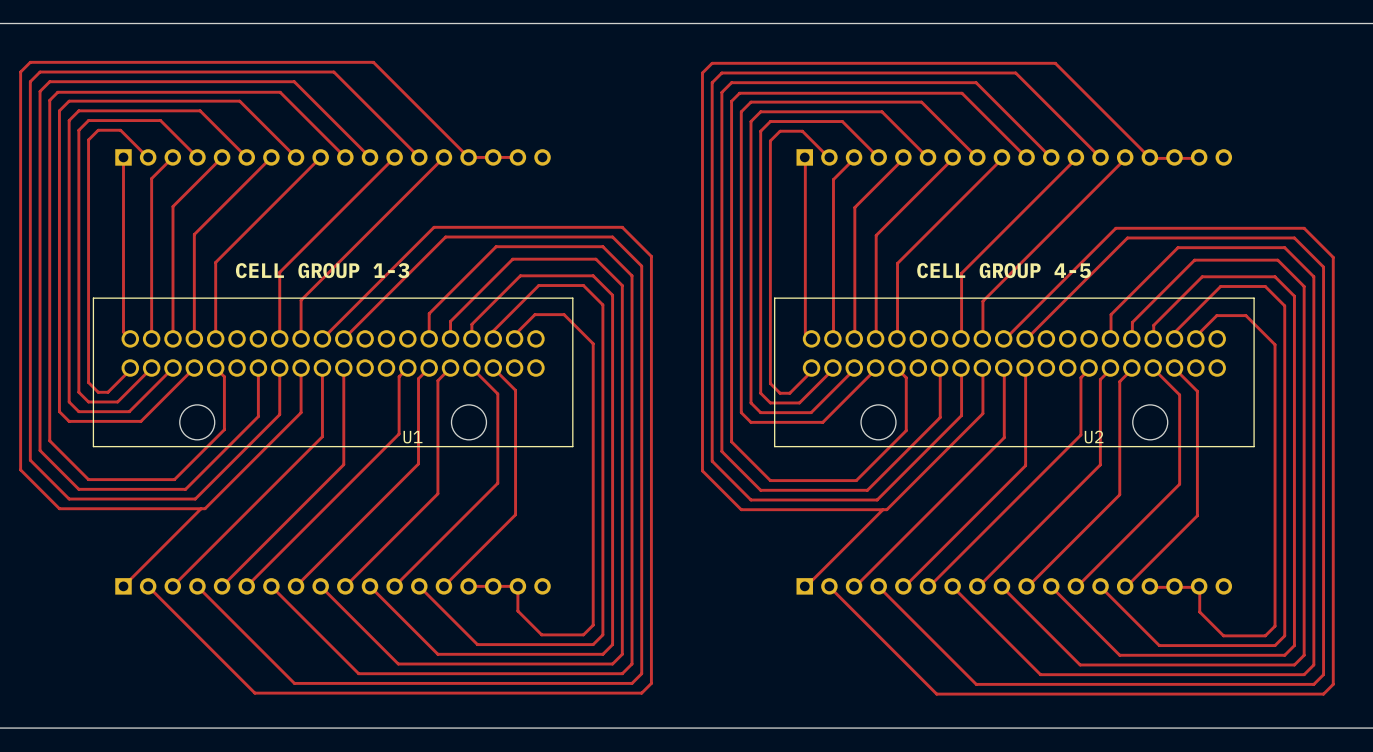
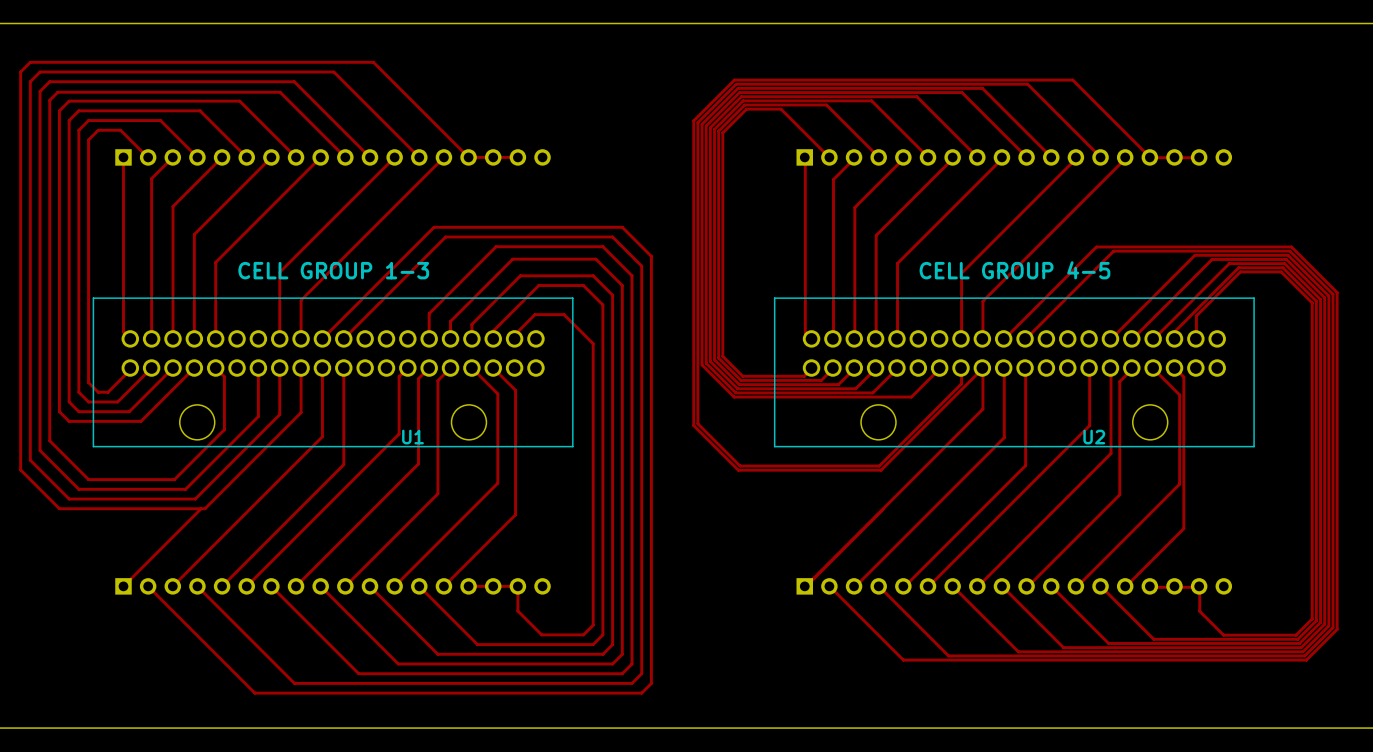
track: none -> (829, 157) (781, 109) (746, 109) (722, 132) (722, 356) (742, 376) (804, 376) (812, 368)
track: none -> (879, 157) (826, 105) (744, 105) (718, 131) (718, 358) (741, 380) (821, 380) (833, 368)
track: none -> (928, 157) (871, 100) (743, 100) (714, 129) (714, 359) (739, 384) (838, 384) (854, 368)
track: none -> (977, 157) (916, 96) (741, 96) (710, 127) (710, 361) (737, 388) (855, 388) (876, 368)
track: none -> (1027, 157) (962, 92) (739, 92) (706, 126) (706, 363) (735, 392) (872, 392) (897, 368)
track: none -> (1051, 157) (982, 88) (737, 88) (702, 124) (702, 364) (734, 397) (911, 397) (940, 368)
track: none -> (1199, 157) (1150, 157) (1072, 80) (734, 80) (693, 120) (693, 425) (738, 470) (881, 470) (982, 368)
track: (829, 158) (802, 131) (780, 131) (770, 140) (770, 383) (780, 393) (789, 393) (812, 368) -> none
track: (879, 158) (842, 121) (770, 121) (760, 131) (760, 393) (770, 402) (799, 402) (833, 368) -> none
track: (928, 158) (882, 111) (760, 111) (750, 121) (750, 402) (760, 412) (811, 412) (854, 368) -> none
track: (977, 158) (921, 102) (750, 102) (741, 111) (741, 412) (750, 422) (822, 422) (876, 368) -> none
track: (1027, 158) (962, 93) (739, 93) (731, 101) (731, 441) (770, 480) (856, 480) (906, 430) (906, 377) (897, 368) -> none
track: (1051, 158) (976, 82) (731, 82) (721, 92) (721, 451) (760, 490) (867, 490) (940, 417) (940, 368) -> none
track: (1101, 158) (1015, 73) (721, 73) (712, 82) (712, 461) (750, 500) (877, 500) (961, 415) (961, 383) -> (1101, 157) (1027, 84) (736, 84) (697, 122) (697, 423) (740, 466) (879, 466) (961, 383)
track: (1199, 158) (1150, 158) (1055, 63) (712, 63) (702, 73) (702, 470) (741, 509) (886, 509) (982, 413) (982, 409) -> (807, 586) (805, 586) (982, 409)
track: (1175, 332) (1220, 286) (1265, 286) (1284, 305) (1284, 635) (1275, 645) (1159, 645) (1101, 587) -> (1175, 332) (1238, 267) (1282, 267) (1316, 301) (1316, 620) (1297, 639) (1153, 639) (1101, 586)
track: (1196, 335) (1216, 315) (1245, 315) (1275, 344) (1275, 626) (1265, 635) (1223, 635) (1199, 611) -> (1196, 335) (1196, 315) (1240, 271) (1281, 271) (1312, 302) (1312, 619) (1296, 635) (1223, 635) (1199, 611)
track: (1004, 339) (1115, 228) (1304, 228) (1333, 257) (1333, 684) (1323, 694) (936, 694) (829, 587) -> none
track: none -> (1004, 339) (1096, 247) (1291, 247) (1337, 292) (1337, 629) (1306, 660) (903, 660) (829, 586)
track: (1025, 339) (1127, 237) (1294, 237) (1323, 267) (1323, 674) (1313, 684) (976, 684) (879, 587) -> none
track: none -> (1025, 339) (1113, 251) (1289, 251) (1332, 294) (1332, 627) (1304, 655) (948, 655) (879, 586)
track: (1111, 339) (1111, 314) (1177, 247) (1284, 247) (1313, 276) (1313, 664) (1304, 674) (1040, 674) (953, 587) -> none
track: none -> (1111, 339) (1194, 255) (1288, 255) (1328, 296) (1328, 625) (1302, 651) (1018, 651) (953, 586)
track: (1132, 339) (1132, 322) (1194, 260) (1277, 260) (1304, 286) (1304, 655) (1294, 664) (1080, 664) (1002, 587) -> none
track: none -> (1132, 339) (1212, 259) (1286, 259) (1324, 297) (1324, 624) (1301, 647) (1063, 647) (1002, 586)
track: (1153, 339) (1153, 325) (1202, 276) (1275, 276) (1294, 296) (1294, 645) (1284, 655) (1119, 655) (1051, 587) -> none
track: none -> (1153, 339) (1229, 263) (1284, 263) (1320, 299) (1320, 622) (1299, 643) (1108, 643) (1051, 586)
track: (1089, 368) (1080, 377) (1080, 434) (928, 587) -> none
track: none -> (1089, 368) (1089, 425) (928, 586)
track: (1111, 368) (1100, 379) (1100, 464) (977, 587) -> none
track: none -> (1111, 368) (1111, 453) (977, 586)
track: (1175, 368) (1197, 391) (1197, 515) (1125, 587) -> none
track: none -> (1175, 368) (1183, 377) (1183, 528) (1125, 586)

